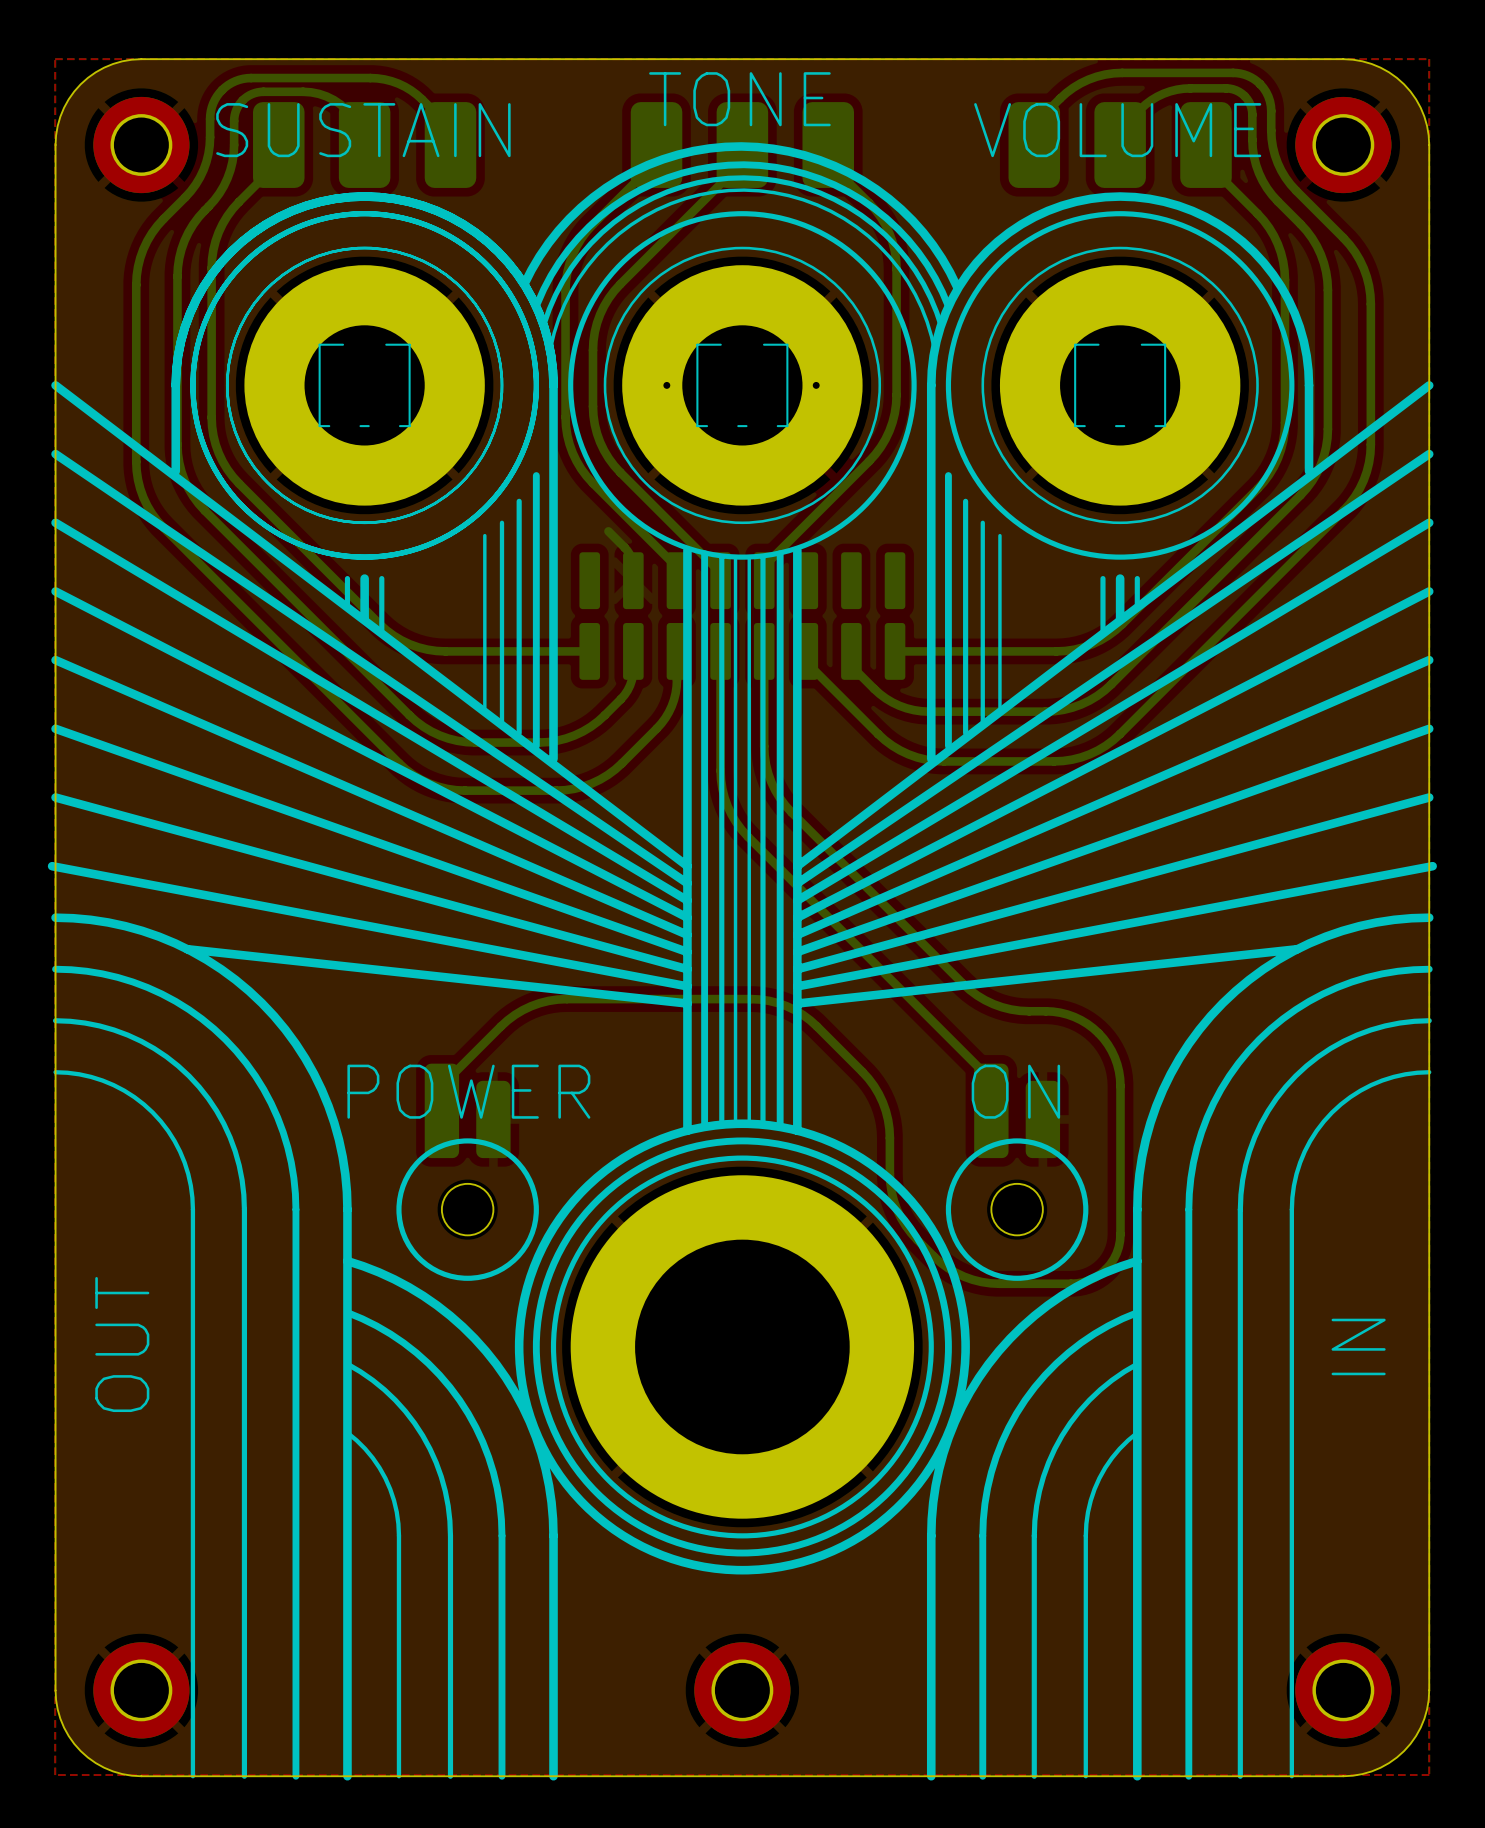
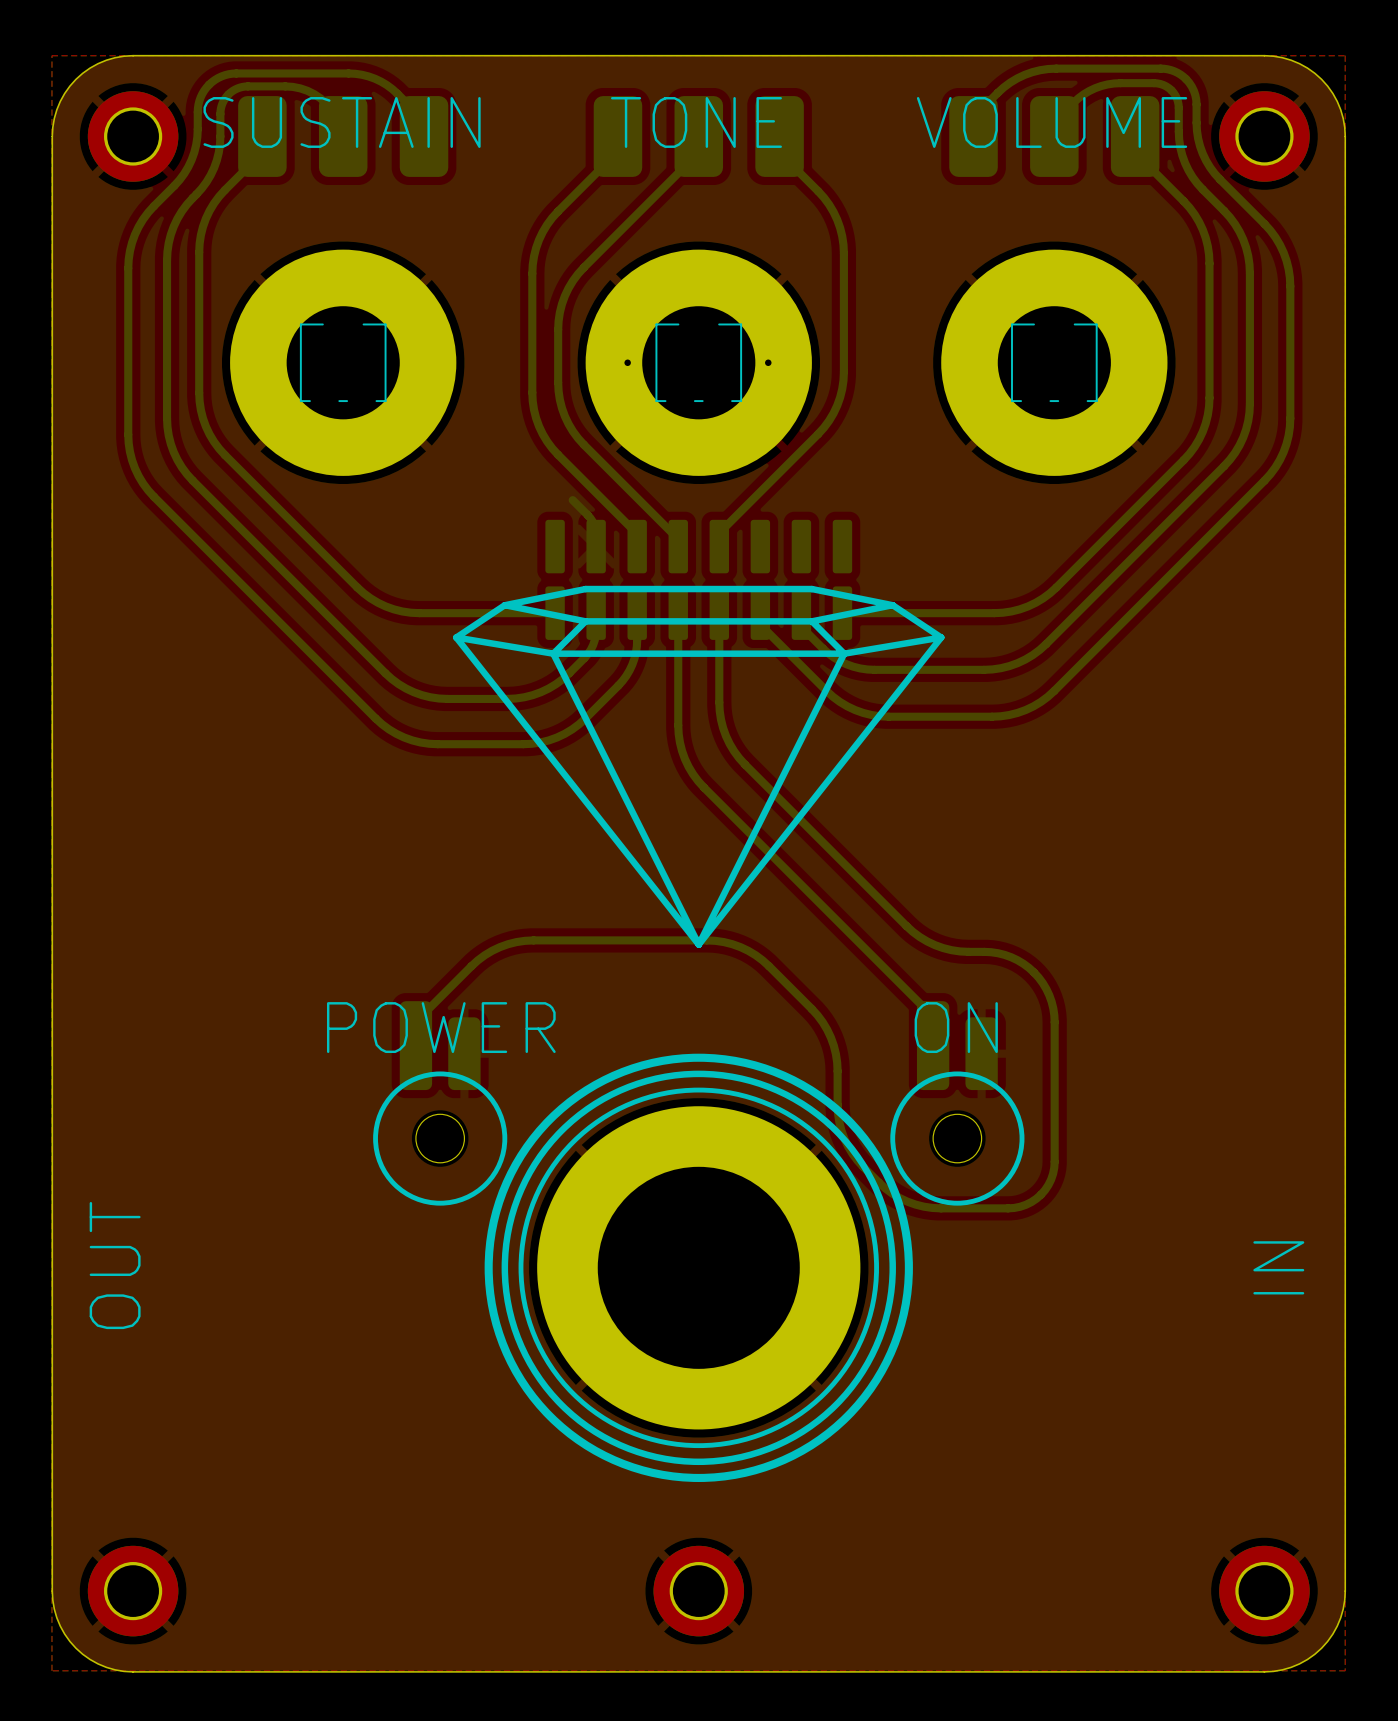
text position: TONE (739, 99) -> TONE (696, 122)
drawing: [190, 211, 539, 560] -> none
drawing: [568, 211, 917, 560] -> none
drawing: [945, 211, 1295, 560] -> none
line: (524, 284) (539, 256) (558, 230) (580, 207) (605, 187) (647, 165) (678, 154) (709, 148) (741, 146) (773, 148) (819, 160) (849, 172) (876, 189) (901, 209) (923, 232) (941, 258) (957, 286) -> none
line: (537, 303) (551, 275) (568, 249) (589, 226) (612, 206) (639, 190) (667, 177) (712, 166) (743, 164) (790, 169) (820, 178) (848, 191) (874, 208) (897, 228) (918, 252) (935, 278) (948, 306) -> none
line: (544, 323) (555, 294) (571, 267) (590, 243) (613, 222) (639, 205) (682, 186) (712, 179) (744, 177) (775, 180) (805, 187) (834, 199) (873, 224) (896, 246) (915, 270) (930, 297) (941, 327) -> none
line: (550, 347) (558, 318) (571, 291) (597, 254) (618, 234) (643, 216) (670, 203) (699, 194) (744, 190) (774, 192) (803, 199) (830, 211) (868, 236) (889, 257) (915, 294) (927, 321) (934, 351) -> none
line: (55, 385) (687, 866) -> none
line: (175, 385) (175, 471) -> none
line: (175, 385) (180, 341) (190, 313) (211, 274) (231, 251) (253, 232) (292, 210) (320, 201) (364, 196) (408, 201) (436, 210) (475, 232) (498, 251) (525, 286) (539, 313) (548, 341) (553, 385) -> none
line: (175, 385) (180, 341) (190, 313) (211, 274) (231, 251) (253, 232) (292, 210) (320, 201) (364, 196) (408, 201) (436, 210) (475, 232) (498, 251) (525, 286) (539, 313) (548, 341) (553, 385) -> none
line: (553, 385) (553, 758) -> none
line: (1429, 385) (797, 866) -> none
line: (55, 454) (687, 883) -> none
line: (1429, 454) (797, 883) -> none
line: (1309, 471) (1308, 370) (1299, 327) (1281, 286) (1263, 262) (1242, 241) (1205, 217) (1178, 205) (1149, 198) (1120, 196) (1090, 198) (1061, 205) (1034, 217) (1009, 232) (986, 251) (959, 286) (940, 327) (933, 355) (931, 385) (931, 758) -> none
line: (536, 475) (536, 745) -> none
line: (948, 475) (948, 745) -> none
line: (519, 501) (519, 733) -> none
line: (965, 501) (965, 733) -> none
line: (55, 522) (687, 900) -> none
line: (501, 522) (501, 723) -> none
line: (982, 522) (982, 723) -> none
line: (1429, 522) (797, 900) -> none
line: (484, 535) (484, 707) -> none
line: (999, 535) (999, 707) -> none
line: (687, 550) (687, 1130) -> none
line: (797, 550) (797, 1130) -> none
line: (704, 553) (704, 1126) -> none
line: (780, 553) (780, 1126) -> none
line: (721, 557) (721, 1123) -> none
line: (735, 557) (735, 1123) -> none
line: (749, 557) (749, 1123) -> none
line: (762, 557) (762, 1123) -> none
line: (347, 578) (347, 604) -> none
line: (364, 578) (364, 619) -> none
line: (381, 578) (381, 630) -> none
line: (1102, 578) (1102, 630) -> none
line: (1120, 578) (1120, 619) -> none
line: (1137, 578) (1137, 604) -> none
line: (55, 591) (687, 917) -> none
line: (1429, 591) (797, 917) -> none
line: none -> (504, 605) (456, 637)
line: none -> (504, 605) (585, 589) (811, 589) (892, 605)
line: none -> (504, 605) (585, 621)
line: none -> (892, 605) (811, 621)
line: none -> (892, 605) (941, 637)
line: (55, 660) (687, 934) -> none
line: none -> (585, 621) (811, 621)
line: none -> (585, 621) (553, 653)
line: none -> (811, 621) (844, 653)
line: (1429, 660) (797, 934) -> none
line: none -> (456, 637) (553, 653)
line: none -> (456, 637) (698, 944)
line: none -> (941, 637) (844, 653)
line: none -> (941, 637) (698, 944)
line: none -> (553, 653) (844, 653)
line: none -> (553, 653) (698, 944)
line: none -> (844, 653) (698, 944)
line: (55, 728) (687, 952) -> none
line: (1429, 728) (797, 952) -> none
line: (55, 797) (687, 969) -> none
line: (1429, 797) (797, 969) -> none
line: (52, 866) (687, 986) -> none
line: (1432, 866) (797, 986) -> none
line: (55, 917) (108, 922) (142, 930) (191, 951) (235, 979) (274, 1016) (295, 1043) (314, 1073) (334, 1122) (342, 1156) (347, 1209) (347, 1776) -> none
line: (1429, 917) (1394, 919) (1342, 930) (1309, 943) (1263, 969) (1222, 1003) (1199, 1029) (1170, 1073) (1150, 1122) (1142, 1156) (1137, 1209) (1137, 1776) -> none
line: (187, 949) (687, 1003) -> none
line: (1297, 949) (797, 1003) -> none
line: (55, 969) (102, 973) (132, 981) (161, 994) (201, 1018) (236, 1051) (255, 1076) (271, 1103) (287, 1147) (293, 1178) (295, 1209) (295, 1776) -> none
line: (1429, 969) (1382, 973) (1351, 981) (1309, 1001) (1282, 1018) (1259, 1039) (1229, 1076) (1213, 1103) (1197, 1147) (1190, 1178) (1188, 1209) (1188, 1776) -> none
line: (55, 1020) (85, 1023) (113, 1029) (141, 1041) (166, 1056) (189, 1076) (208, 1098) (223, 1123) (239, 1165) (244, 1209) (244, 1776) -> none
line: (1429, 1020) (1385, 1025) (1356, 1035) (1330, 1048) (1306, 1065) (1285, 1086) (1268, 1110) (1254, 1137) (1245, 1165) (1240, 1209) (1240, 1776) -> none
line: (55, 1072) (79, 1074) (102, 1080) (124, 1090) (143, 1104) (160, 1121) (174, 1140) (184, 1162) (190, 1185) (192, 1209) (192, 1776) -> none
line: (1429, 1072) (1405, 1074) (1382, 1080) (1360, 1090) (1340, 1104) (1323, 1121) (1310, 1140) (1300, 1162) (1293, 1185) (1291, 1209) (1291, 1776) -> none
line: (347, 1261) (394, 1279) (423, 1295) (450, 1315) (474, 1338) (496, 1364) (514, 1392) (529, 1421) (545, 1469) (553, 1519) (553, 1776) -> none
line: (1137, 1261) (1090, 1279) (1061, 1295) (1034, 1315) (1010, 1338) (988, 1364) (970, 1392) (954, 1421) (939, 1469) (931, 1519) (931, 1776) -> none
line: (347, 1312) (390, 1333) (428, 1363) (450, 1387) (468, 1413) (488, 1457) (497, 1488) (501, 1519) (501, 1776) -> none
line: (1137, 1312) (1108, 1325) (1080, 1342) (1045, 1375) (1016, 1413) (996, 1457) (987, 1488) (983, 1519) (982, 1776) -> none
line: (347, 1364) (384, 1389) (414, 1423) (436, 1462) (445, 1491) (450, 1535) (450, 1776) -> none
line: (1137, 1364) (1112, 1380) (1079, 1411) (1054, 1448) (1039, 1491) (1034, 1535) (1034, 1776) -> none
line: (347, 1432) (365, 1448) (379, 1467) (390, 1489) (396, 1512) (398, 1535) (398, 1776) -> none
line: (1137, 1432) (1119, 1448) (1105, 1467) (1094, 1489) (1088, 1512) (1085, 1535) (1085, 1776) -> none

